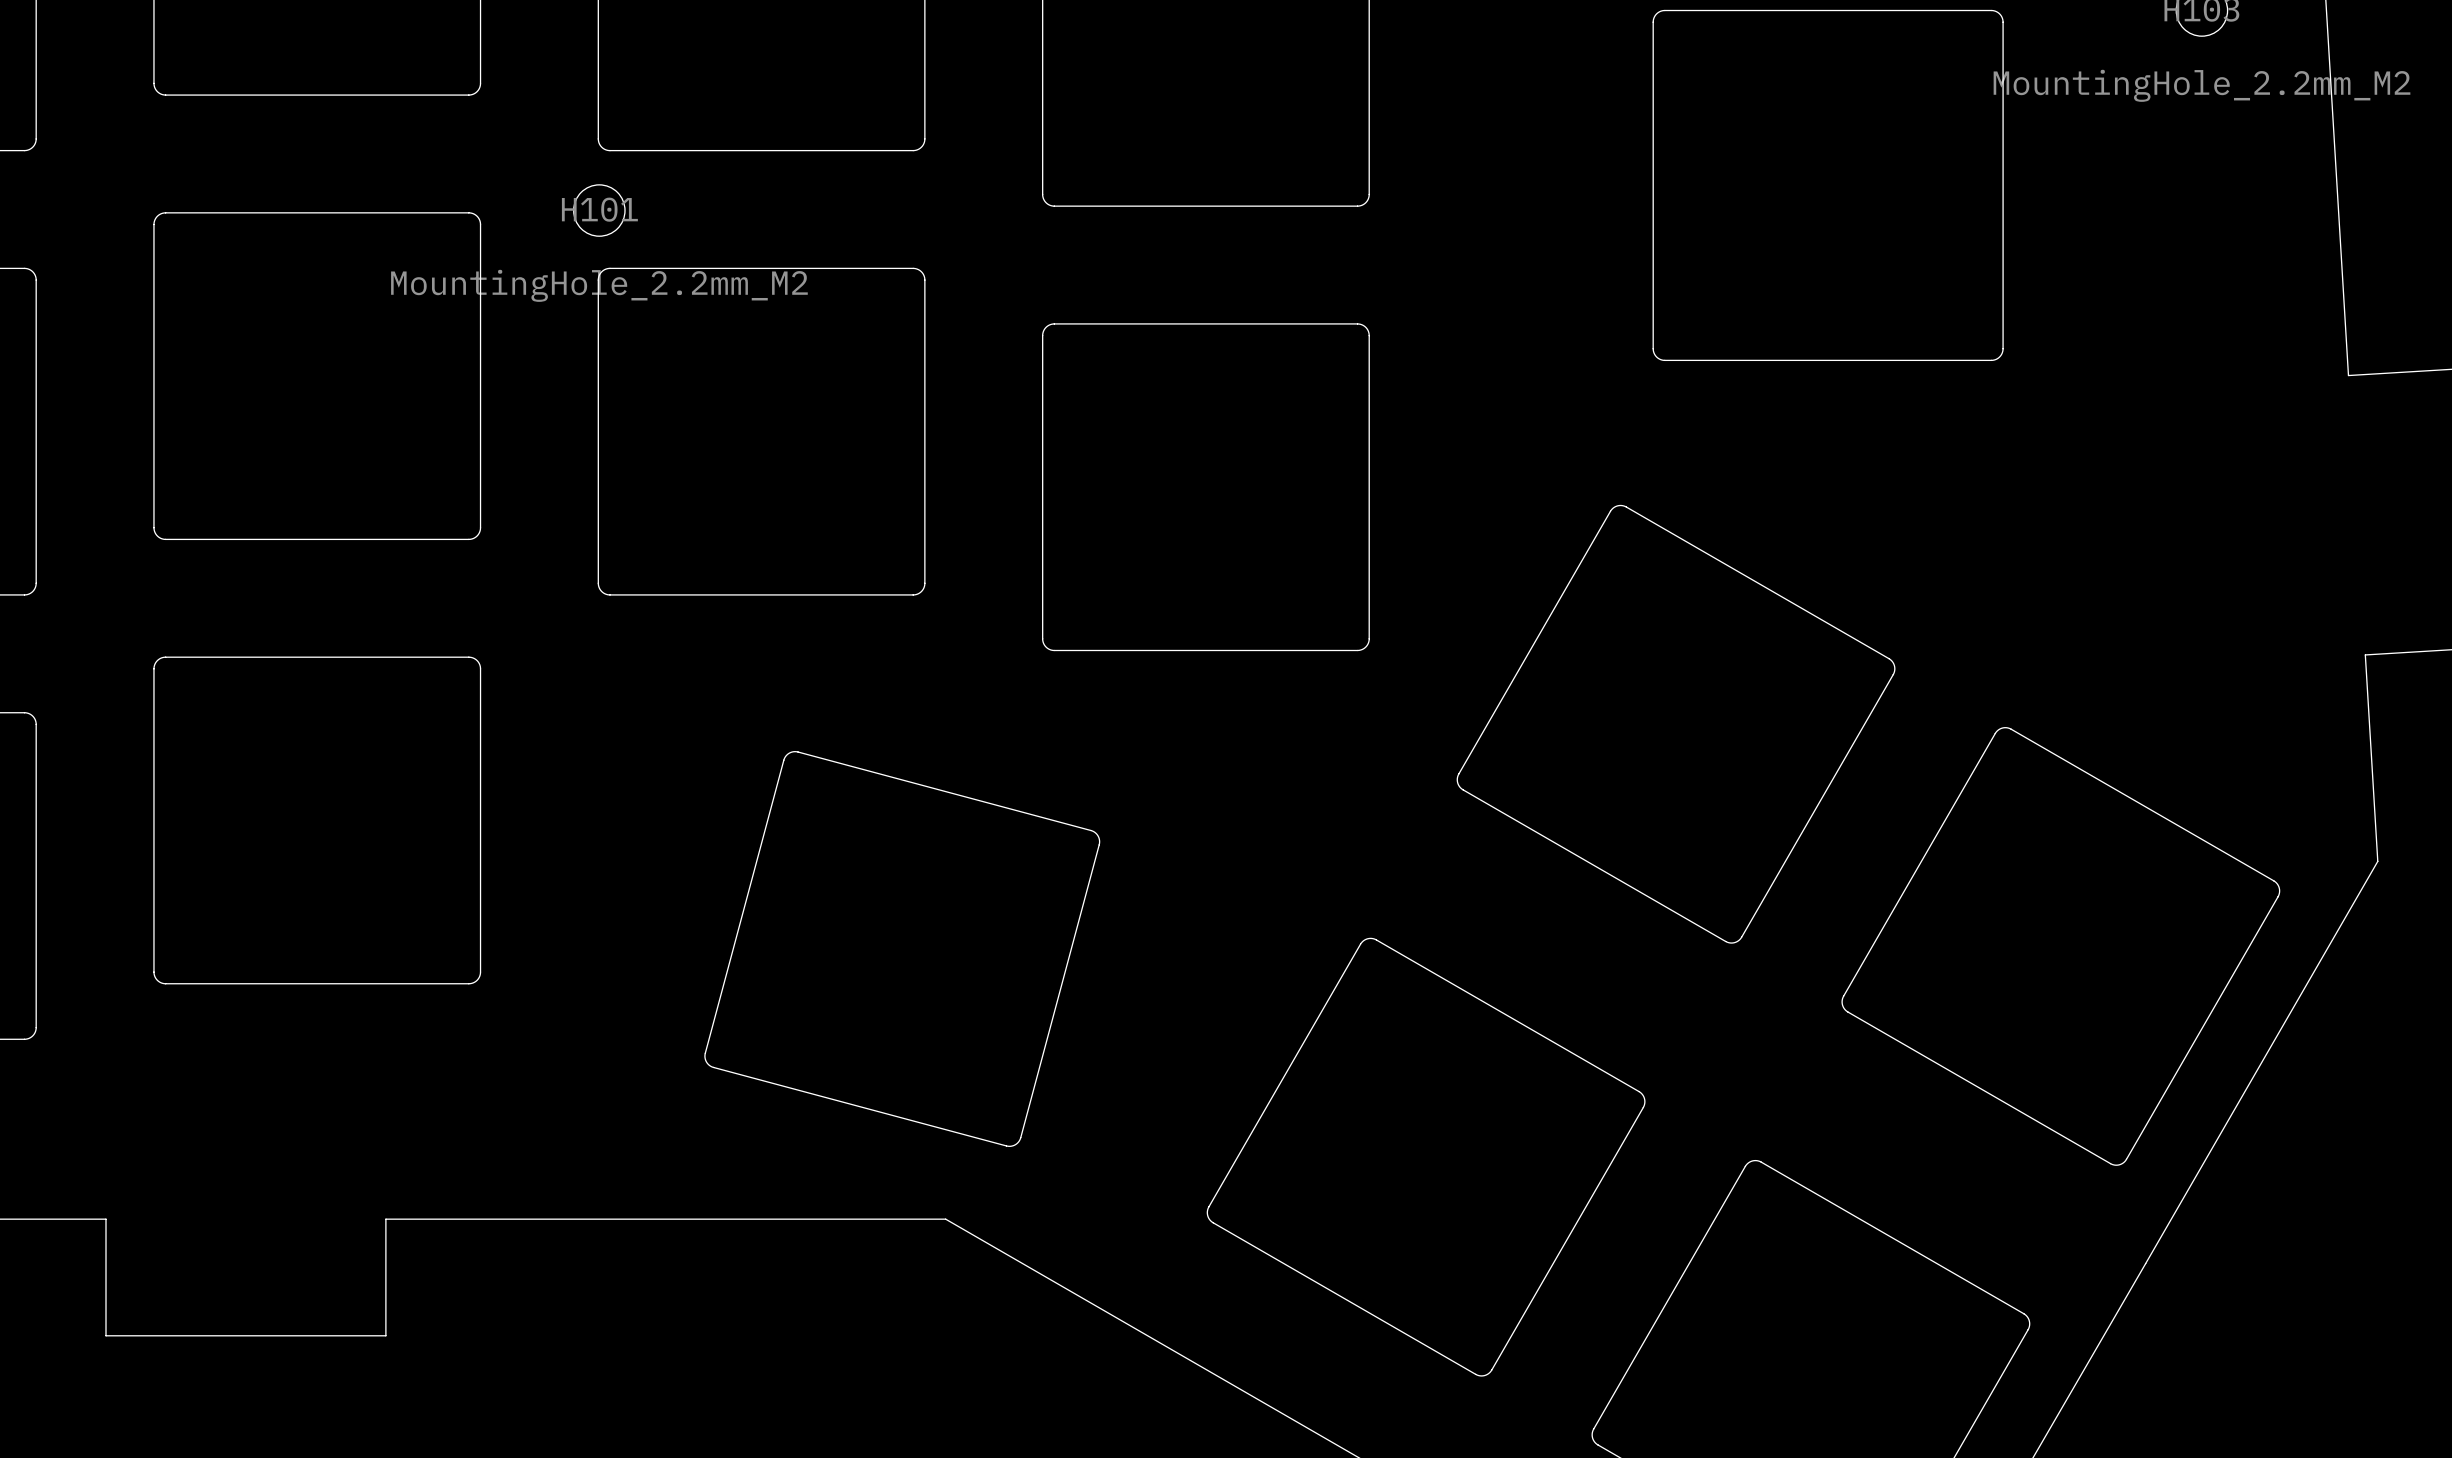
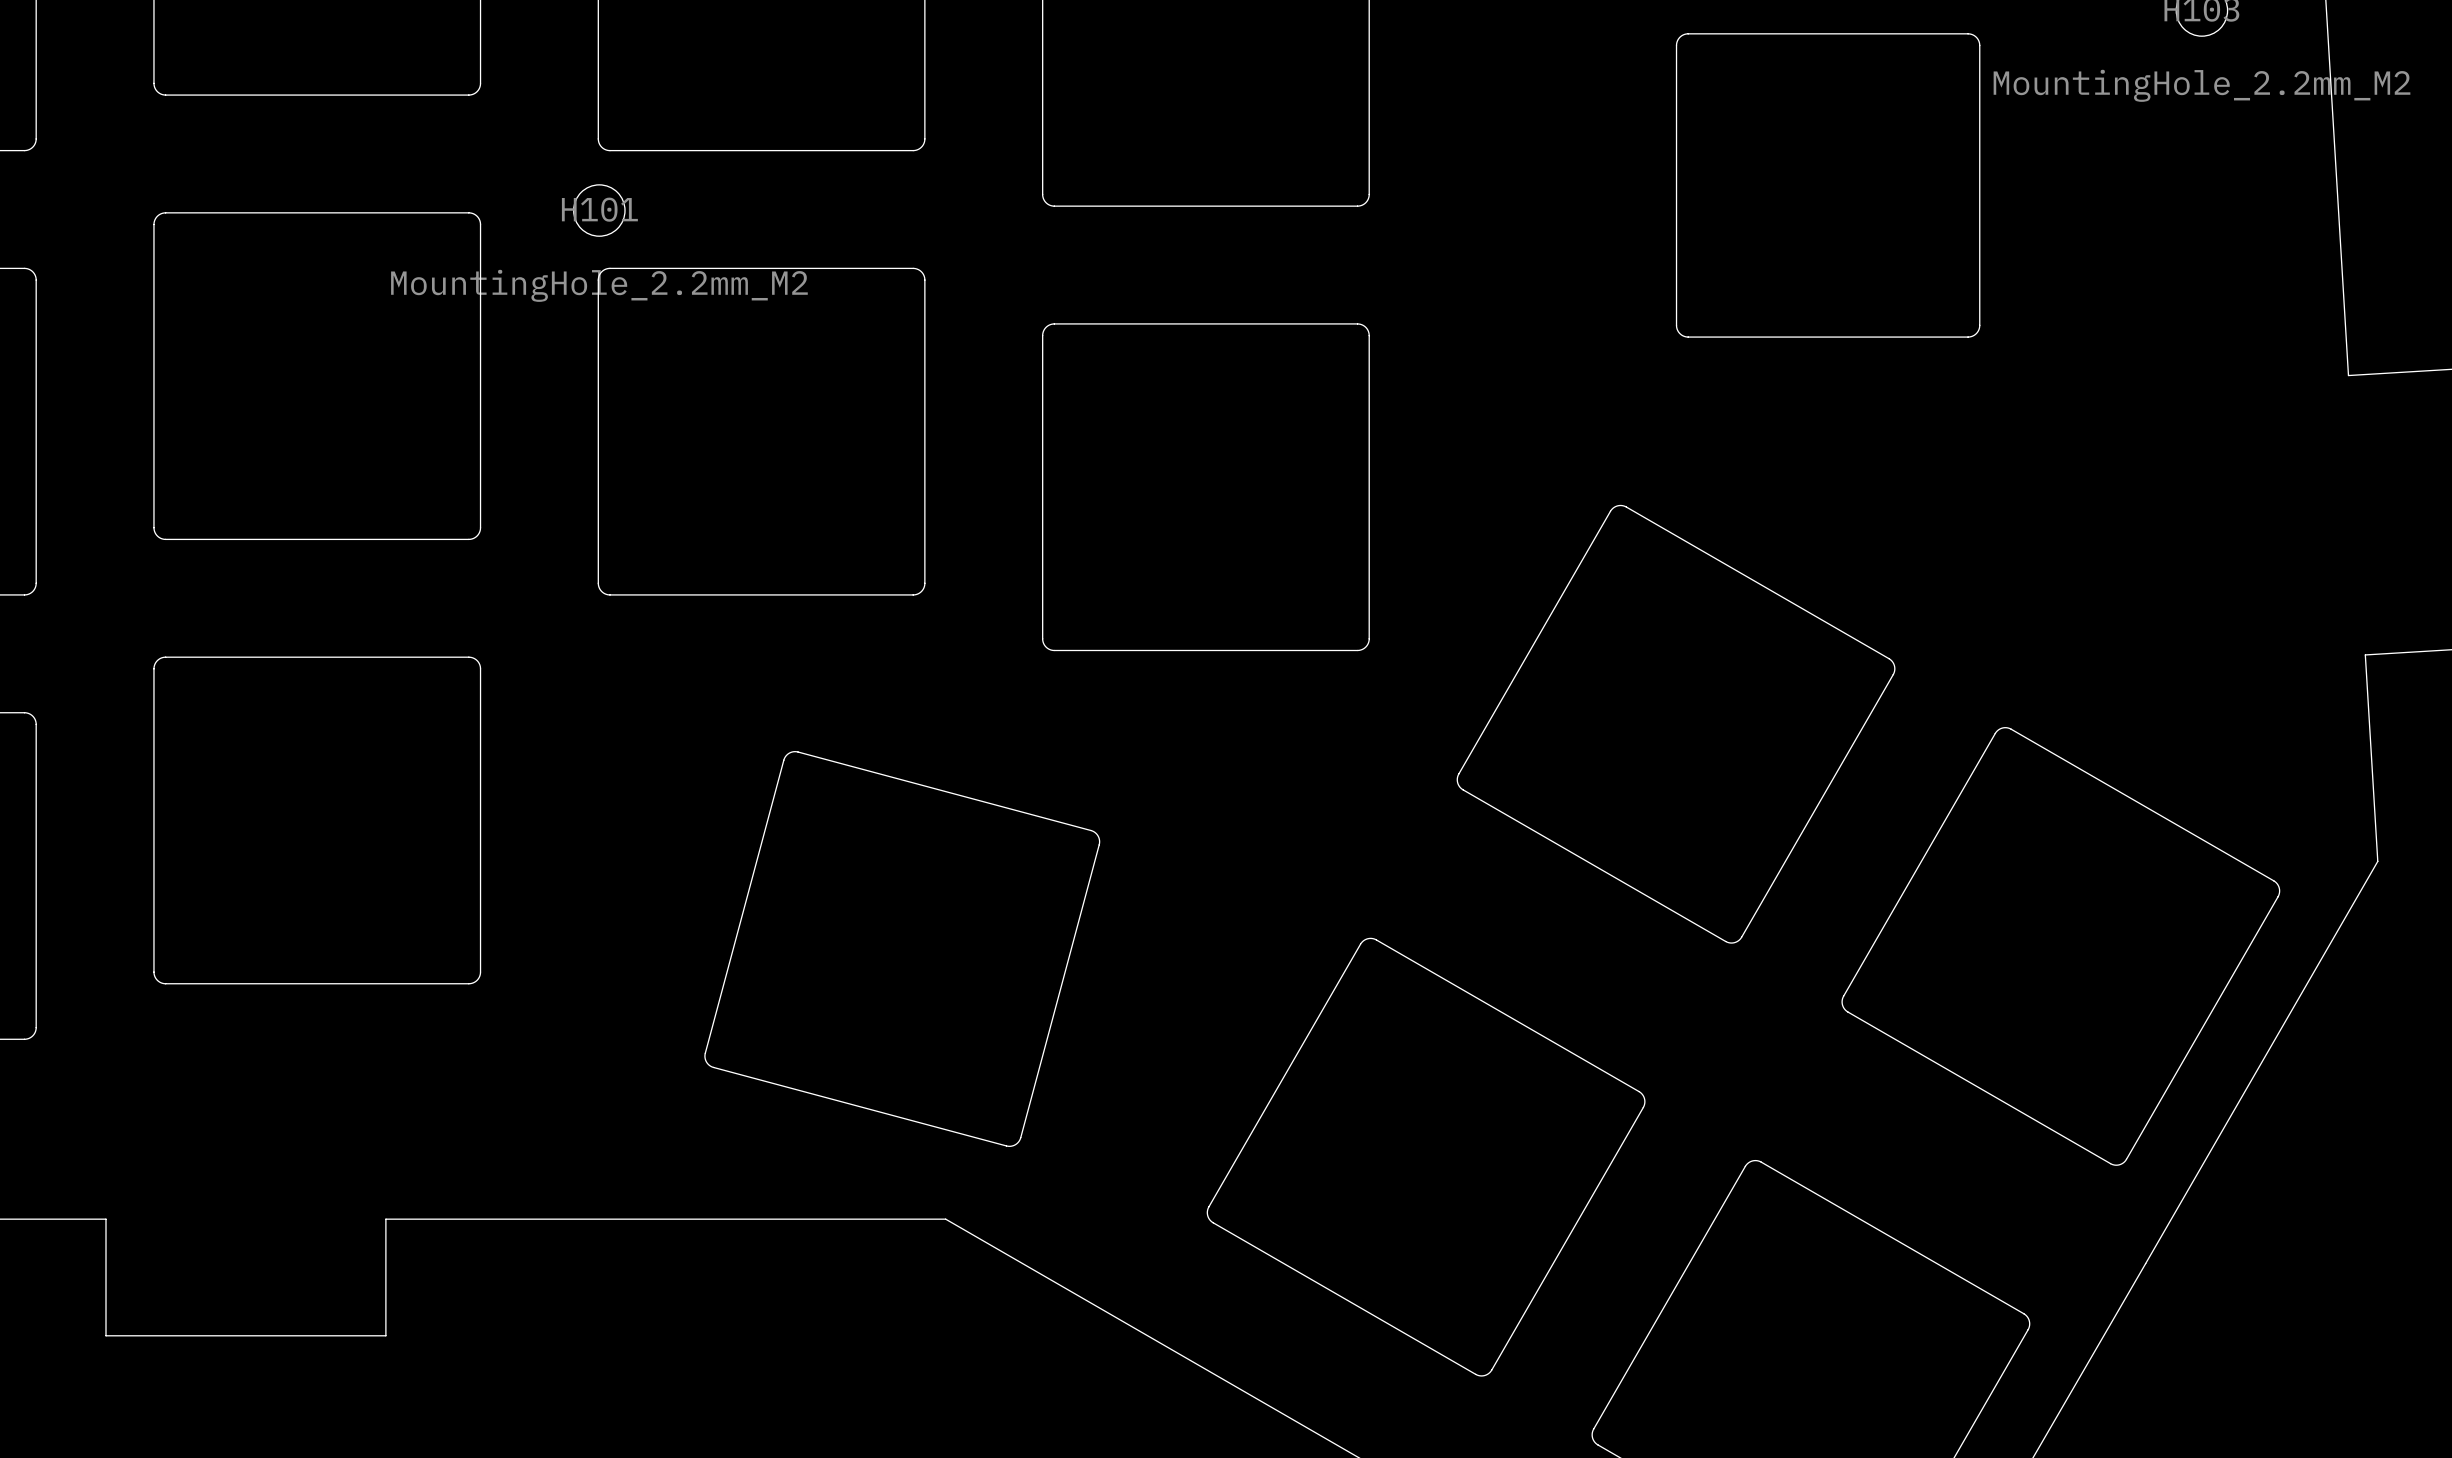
board edge: (1664, 10) (1991, 10) (1999, 13) (2003, 22) (2003, 348) (1999, 356) (1991, 360) (1664, 360) (1656, 356) (1653, 348) (1653, 22) (1656, 13) (1664, 10) -> (1688, 33) (1679, 37) (1676, 45) (1676, 325) (1679, 333) (1688, 337) (1968, 337) (1976, 333) (1979, 325) (1979, 45) (1976, 37) (1968, 33) (1688, 33)

